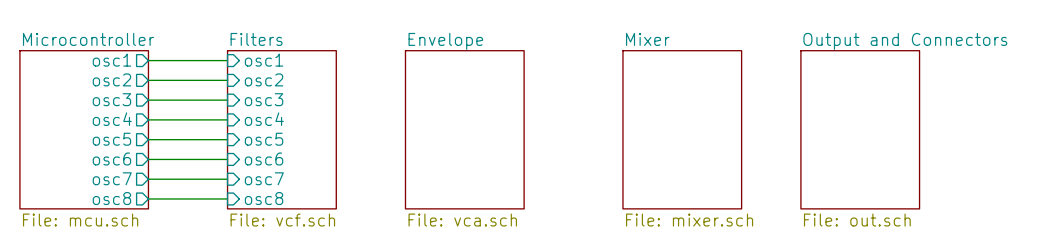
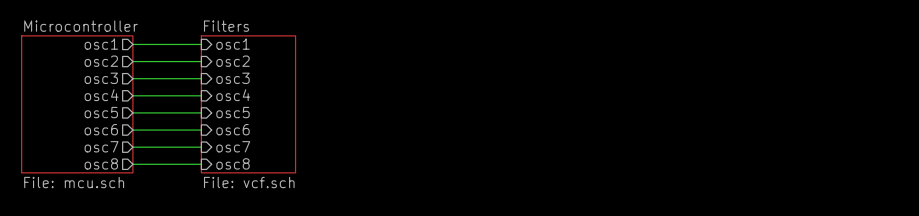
sheet Envelope: File: vca.sch (464, 129) -> none
sheet Mixer: File: mixer.sch (682, 129) -> none
sheet Output and Connectors: File: out.sch (860, 129) -> none

